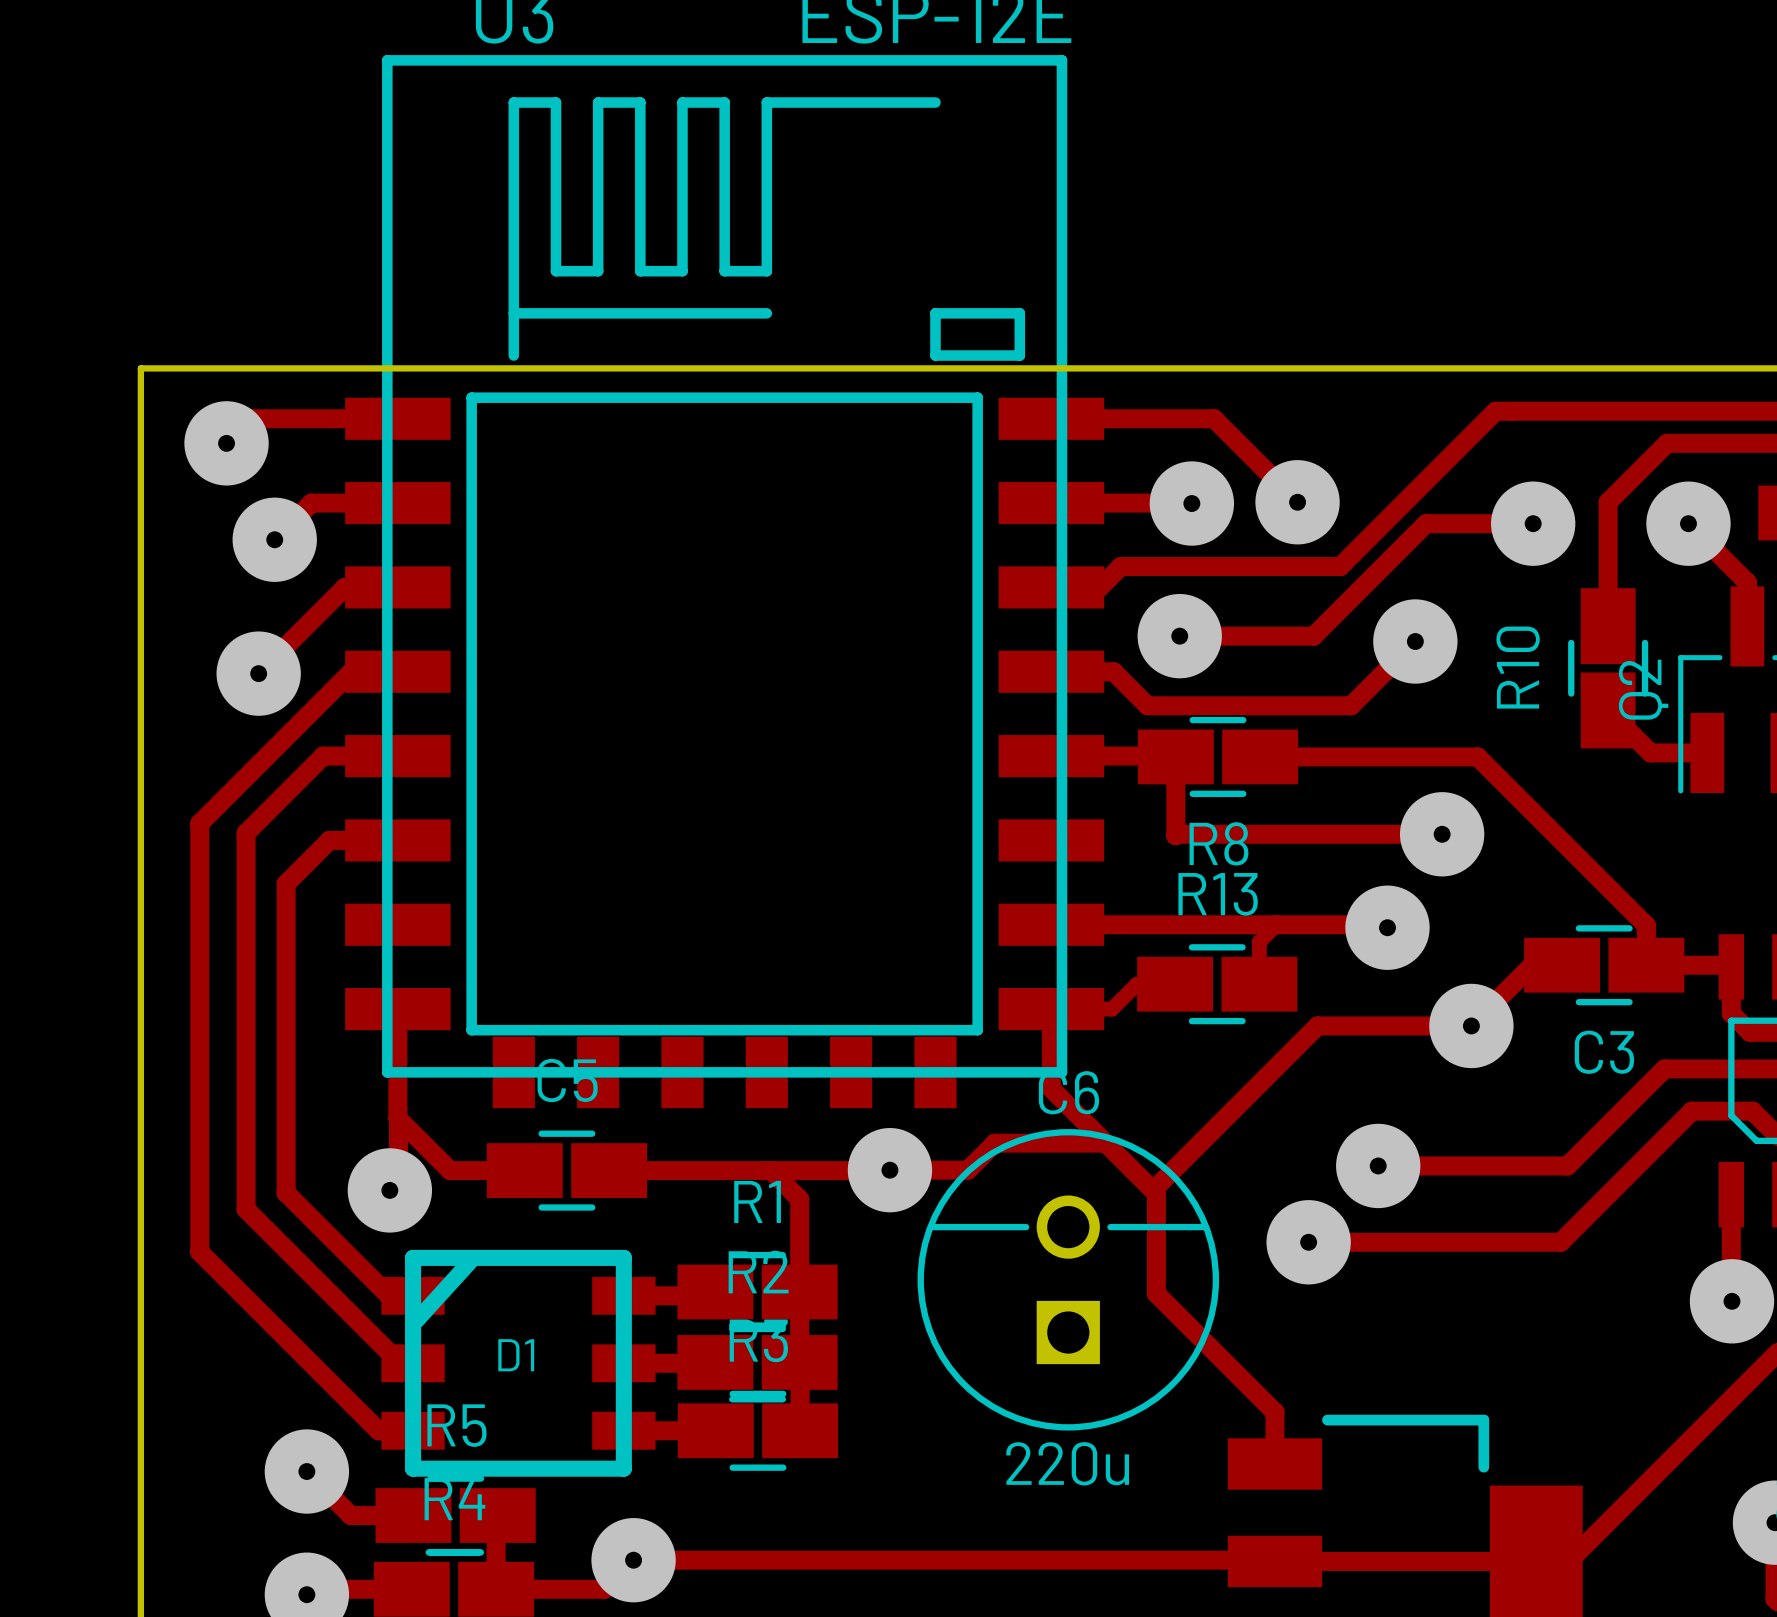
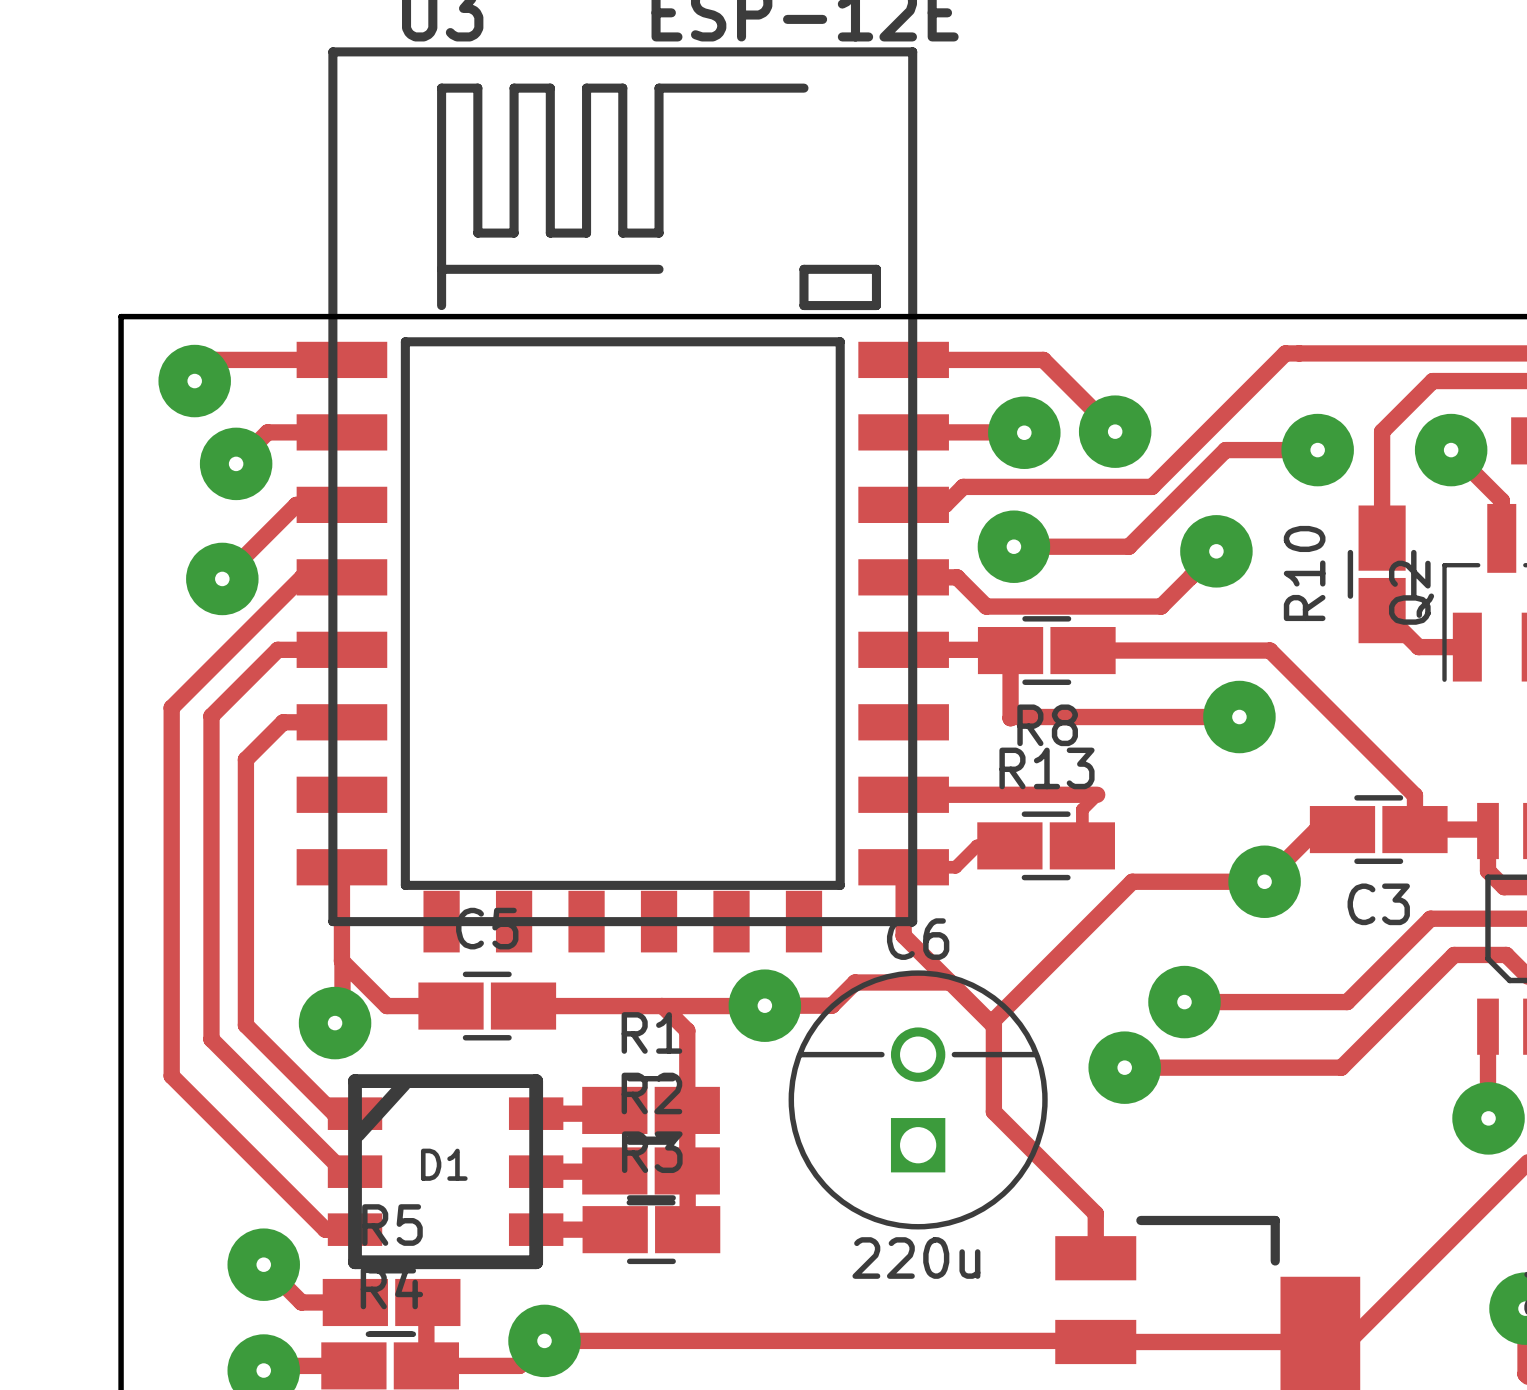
track: (1276, 924) (1384, 924) (1387, 927) -> none
via: (1387, 927) -> none

